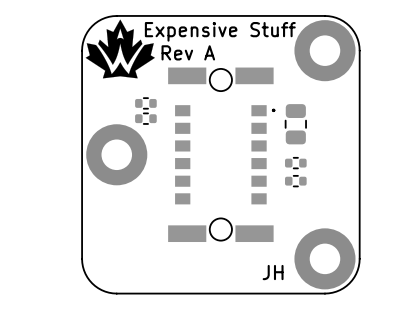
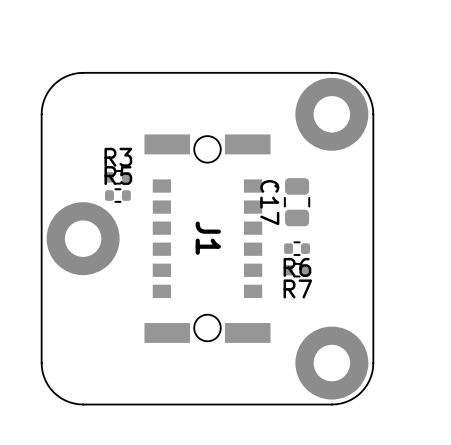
drawing: [85, 19, 155, 79] -> none
text: Expensive Stuff (220, 31) -> none
text: Rev A (188, 52) -> none
R3 name: none -> R3 (118, 157)
R5 name: none -> R5 (118, 175)
C17 name: none -> C17 (269, 202)
part: (221, 154) -> none
J1: none -> (211, 238)
R6 name: none -> R6 (297, 267)
R7 name: none -> R7 (297, 288)
text: JH (273, 272) -> none

